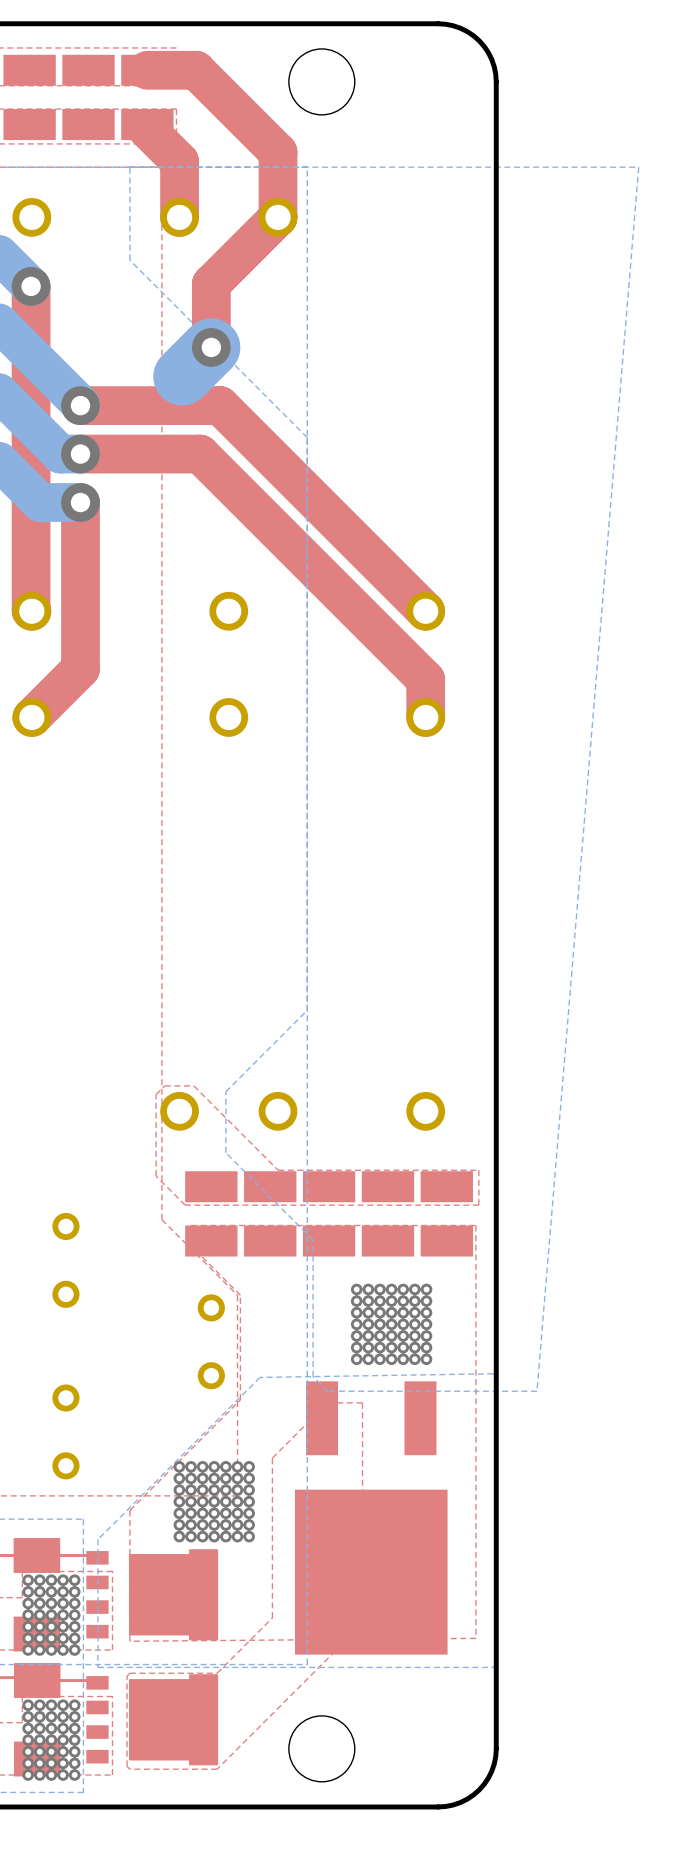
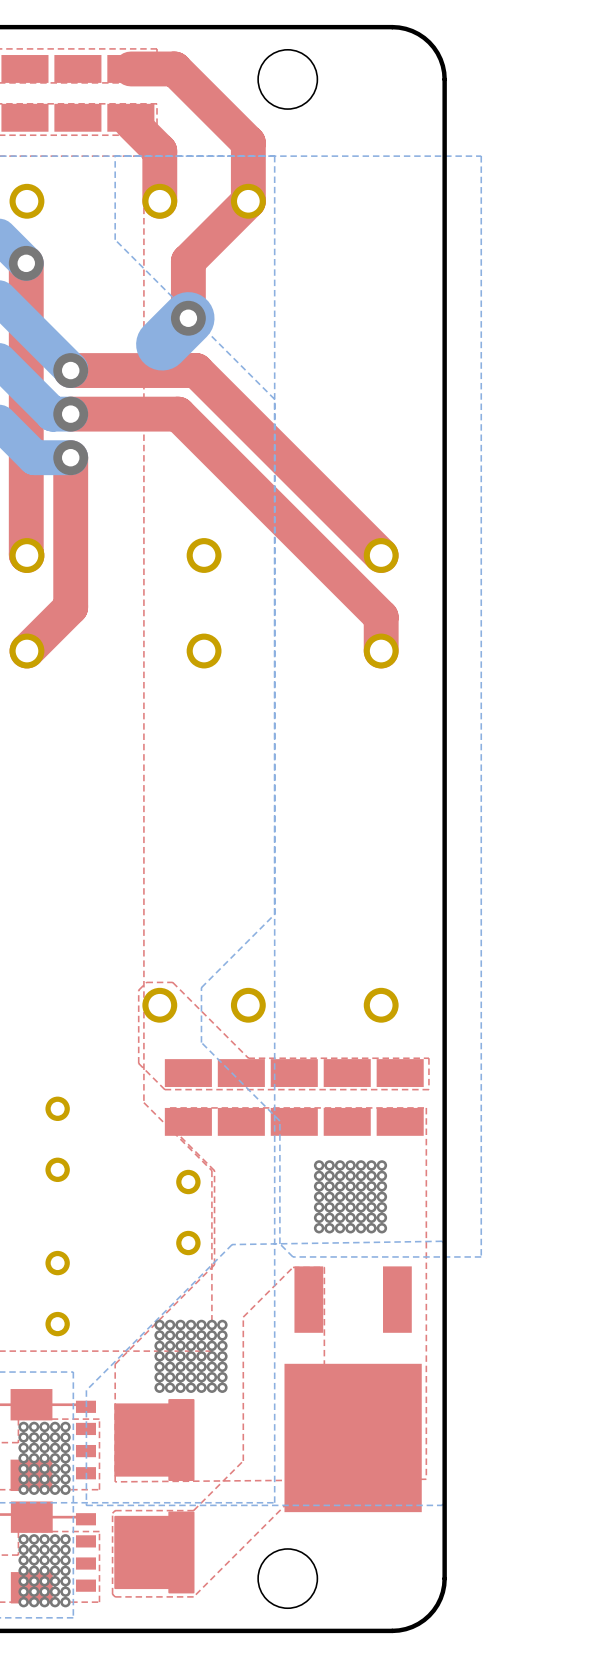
bottom zone outline: (536, 167) (638, 167) (536, 1391) -> (481, 156) (481, 1256)
part position: (371, 1517) -> (353, 1389)

